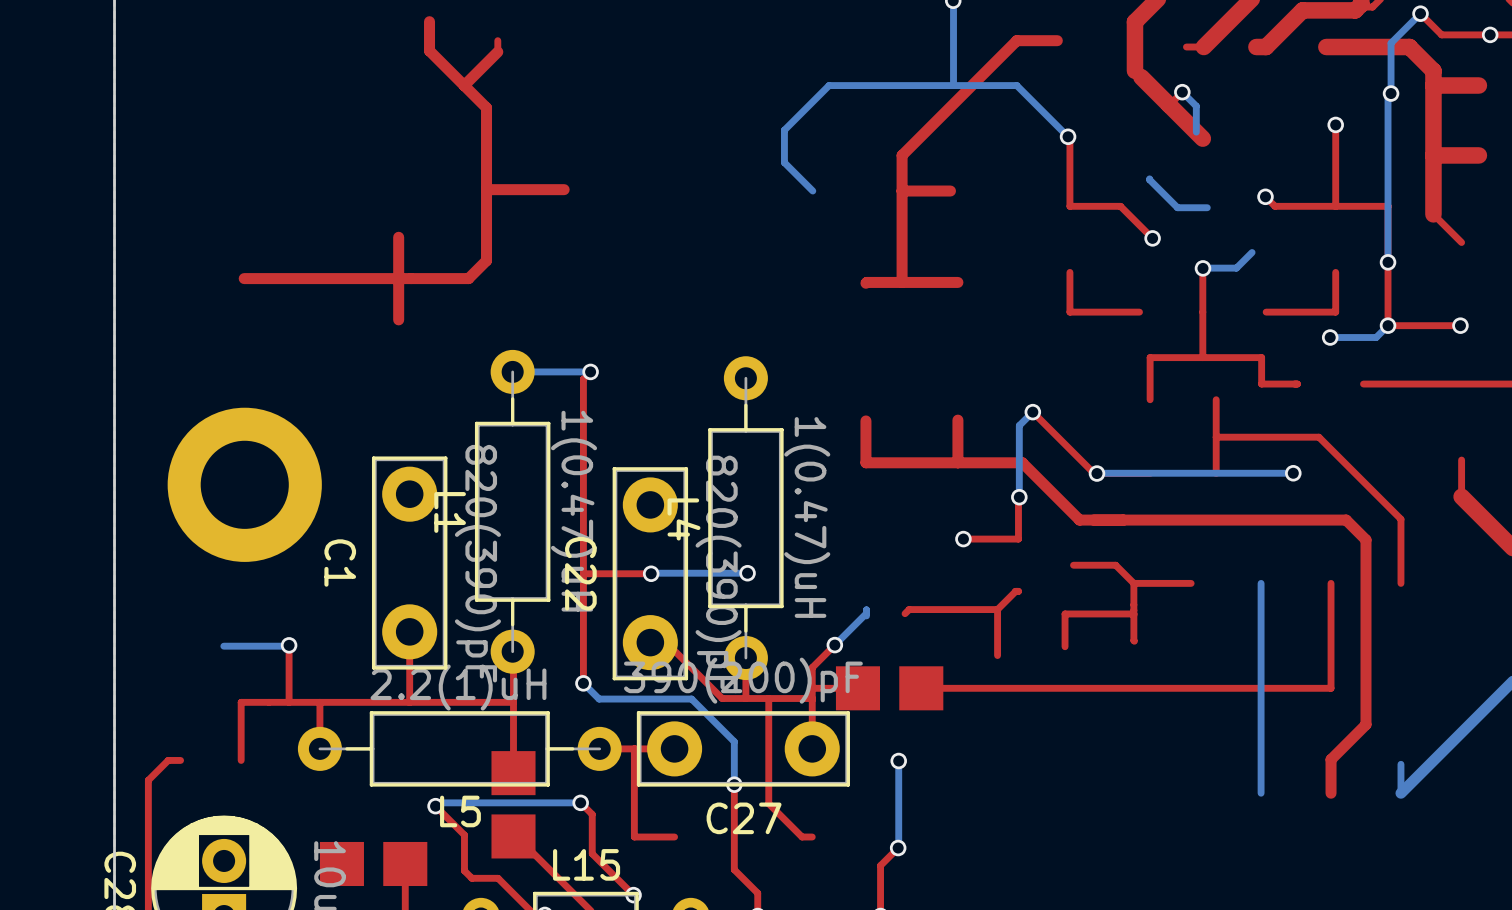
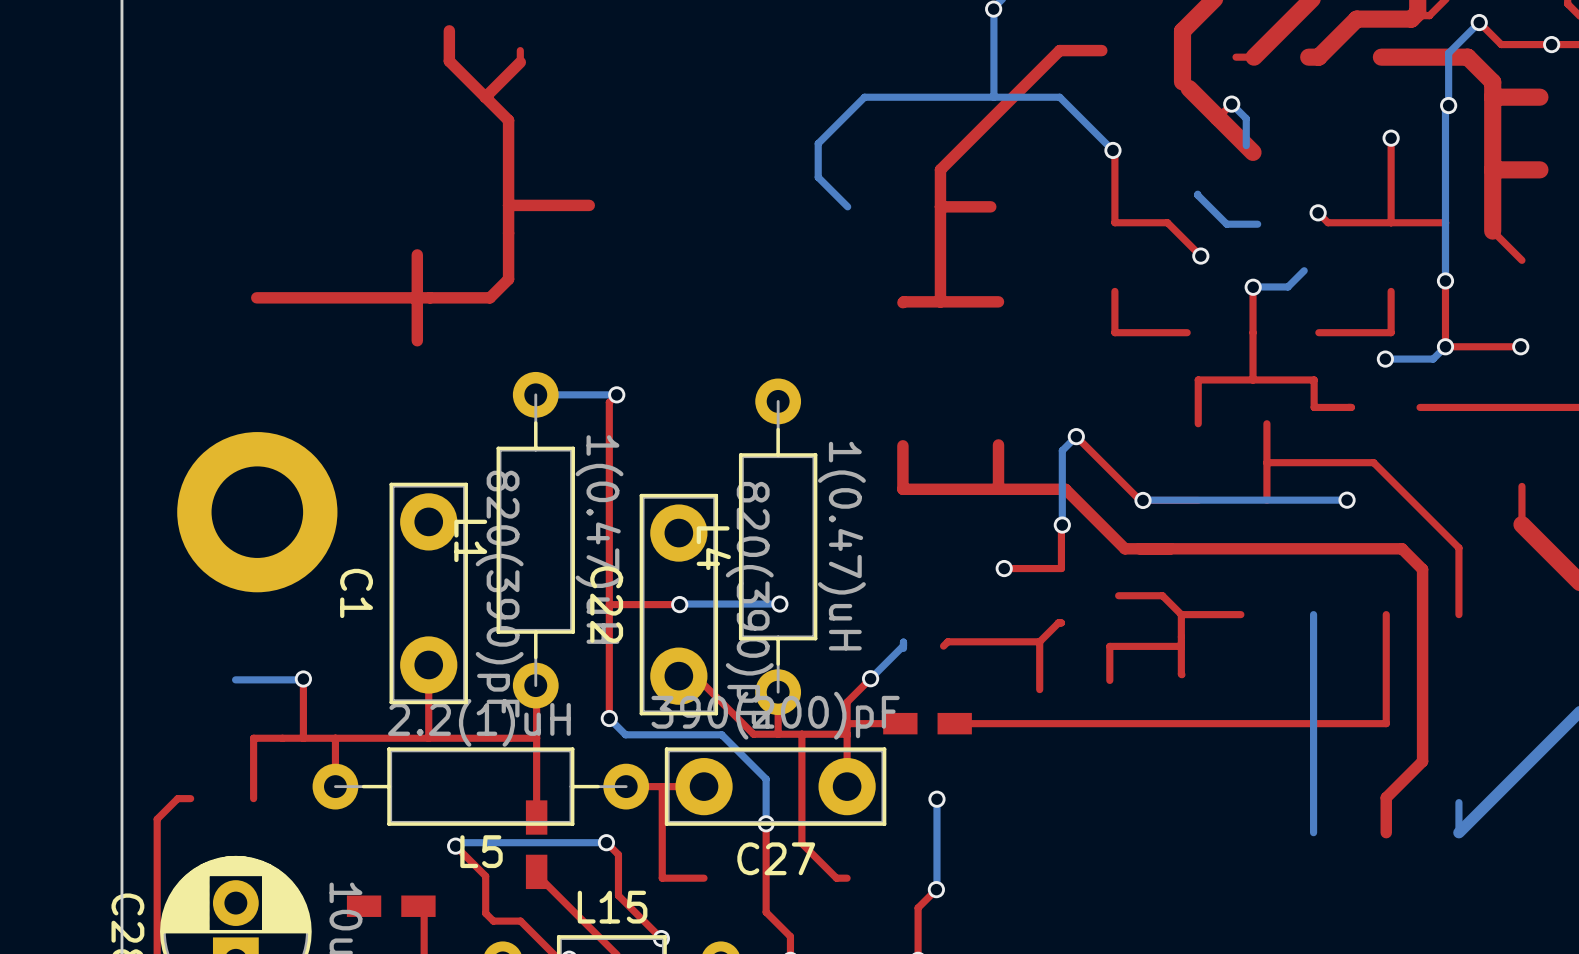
part footprint: [835, 666, 944, 711] -> [883, 712, 972, 735]
part footprint: [491, 751, 536, 859] -> [525, 800, 548, 890]
part footprint: [319, 841, 428, 887] -> [346, 895, 436, 917]

